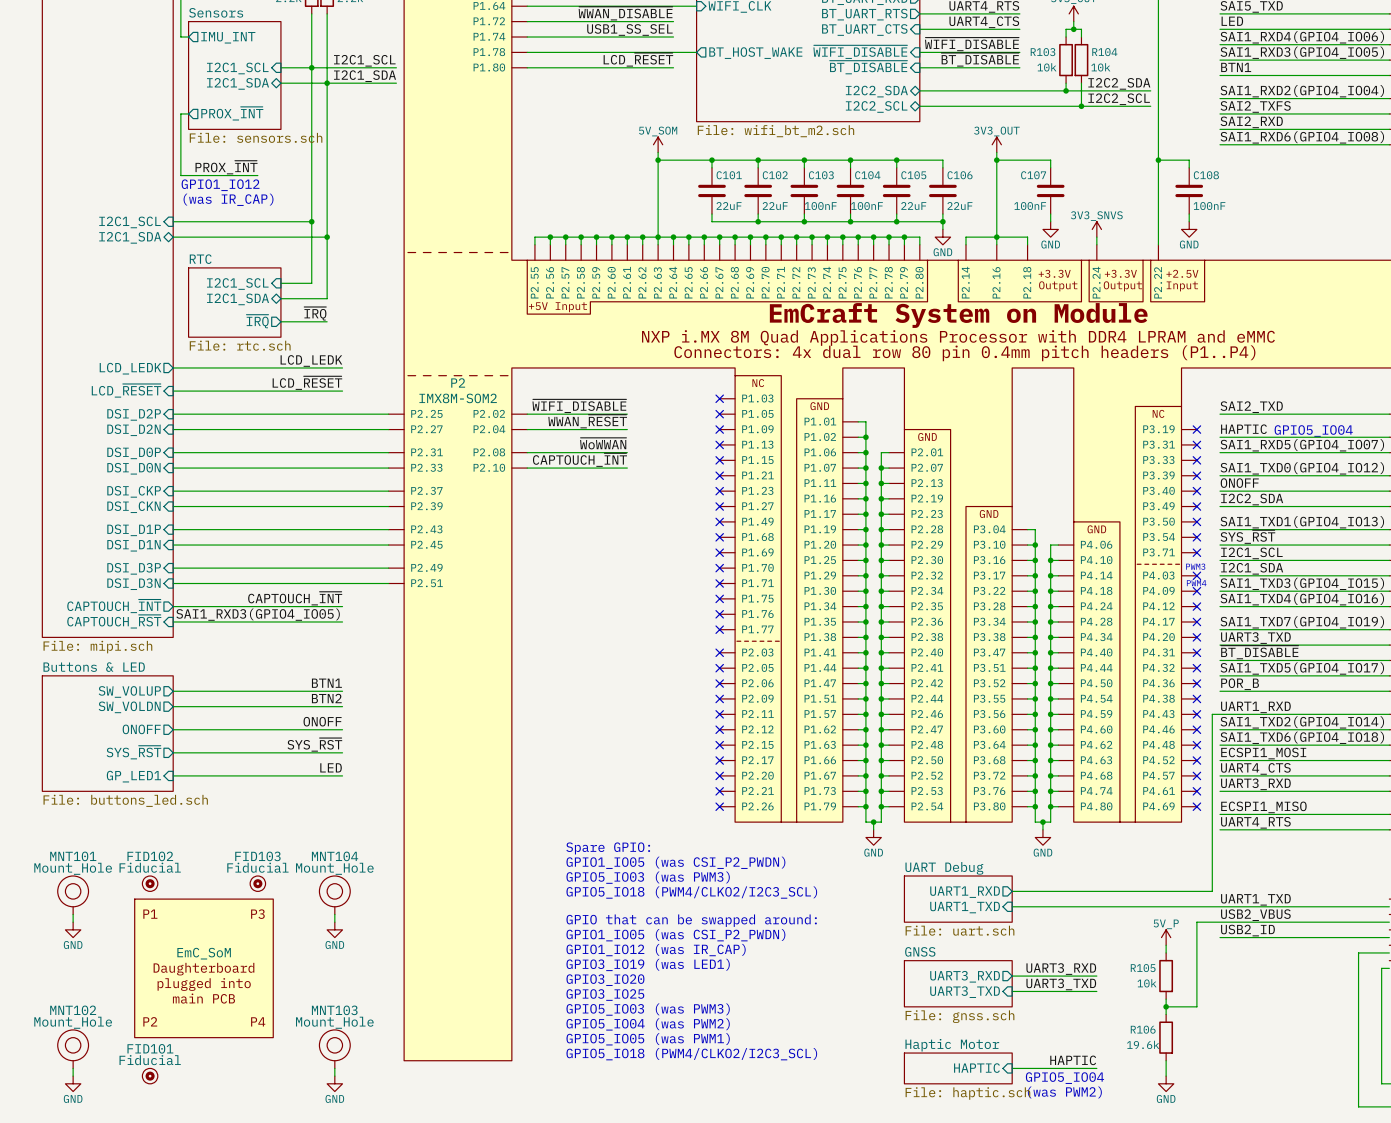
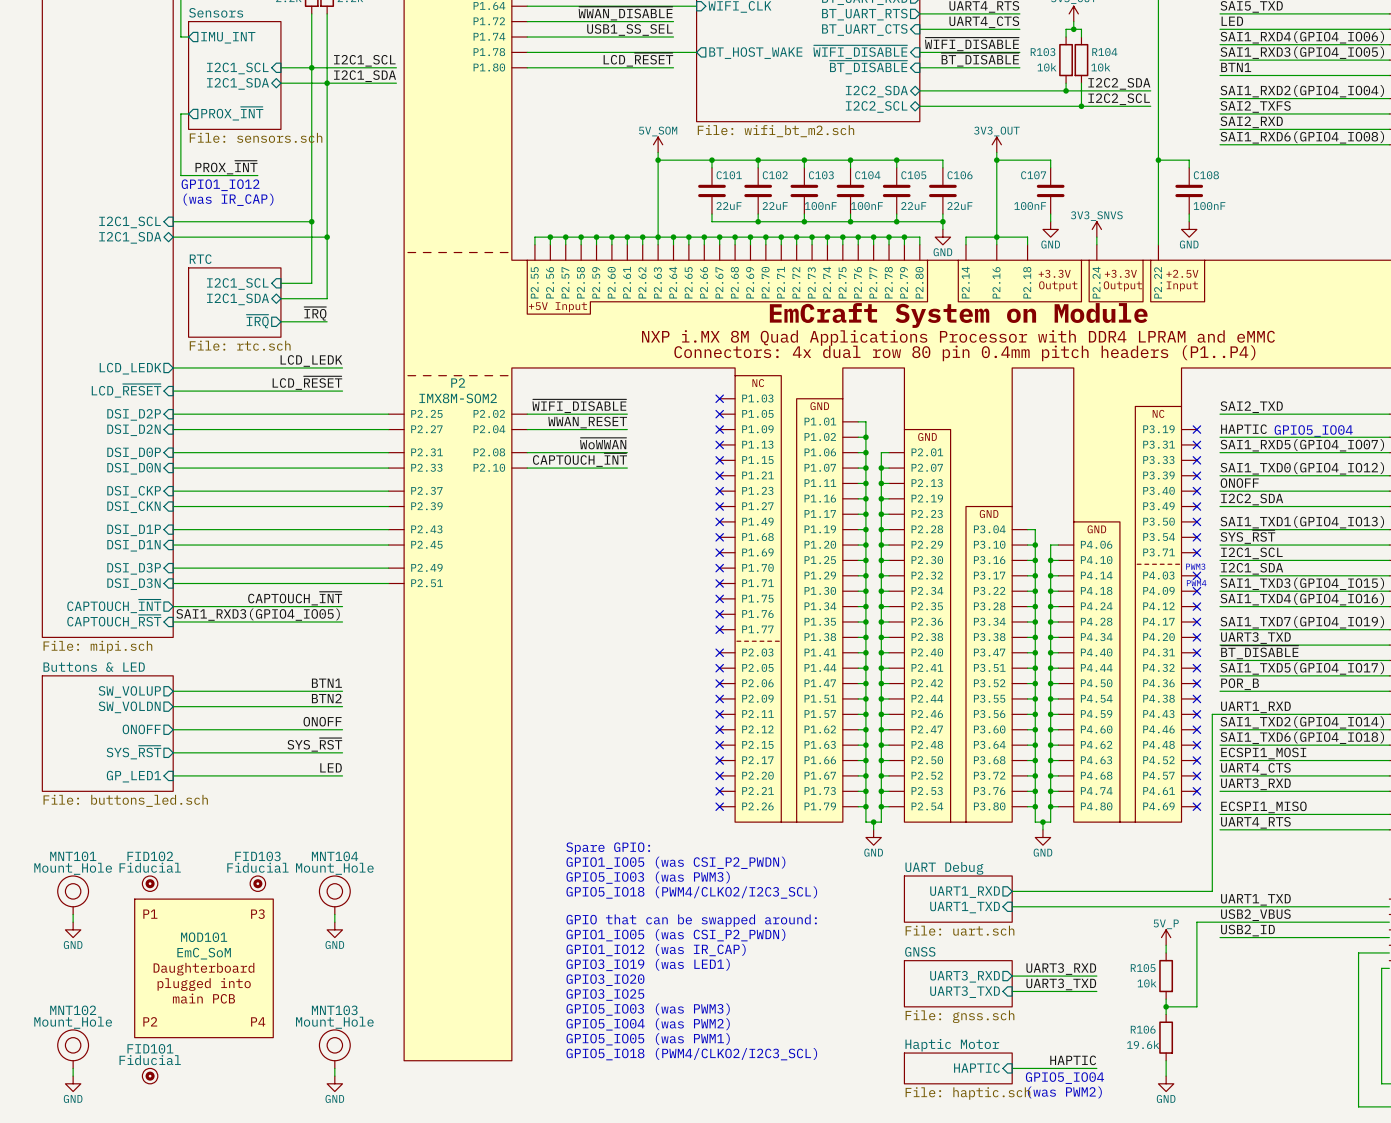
label: WWAN_~{RESET} (587, 421) -> WWAN_RESET (587, 422)
power symbol: EmC_SoM (203, 968) -> none
MOD101: none -> EmC_SoM (203, 968)

